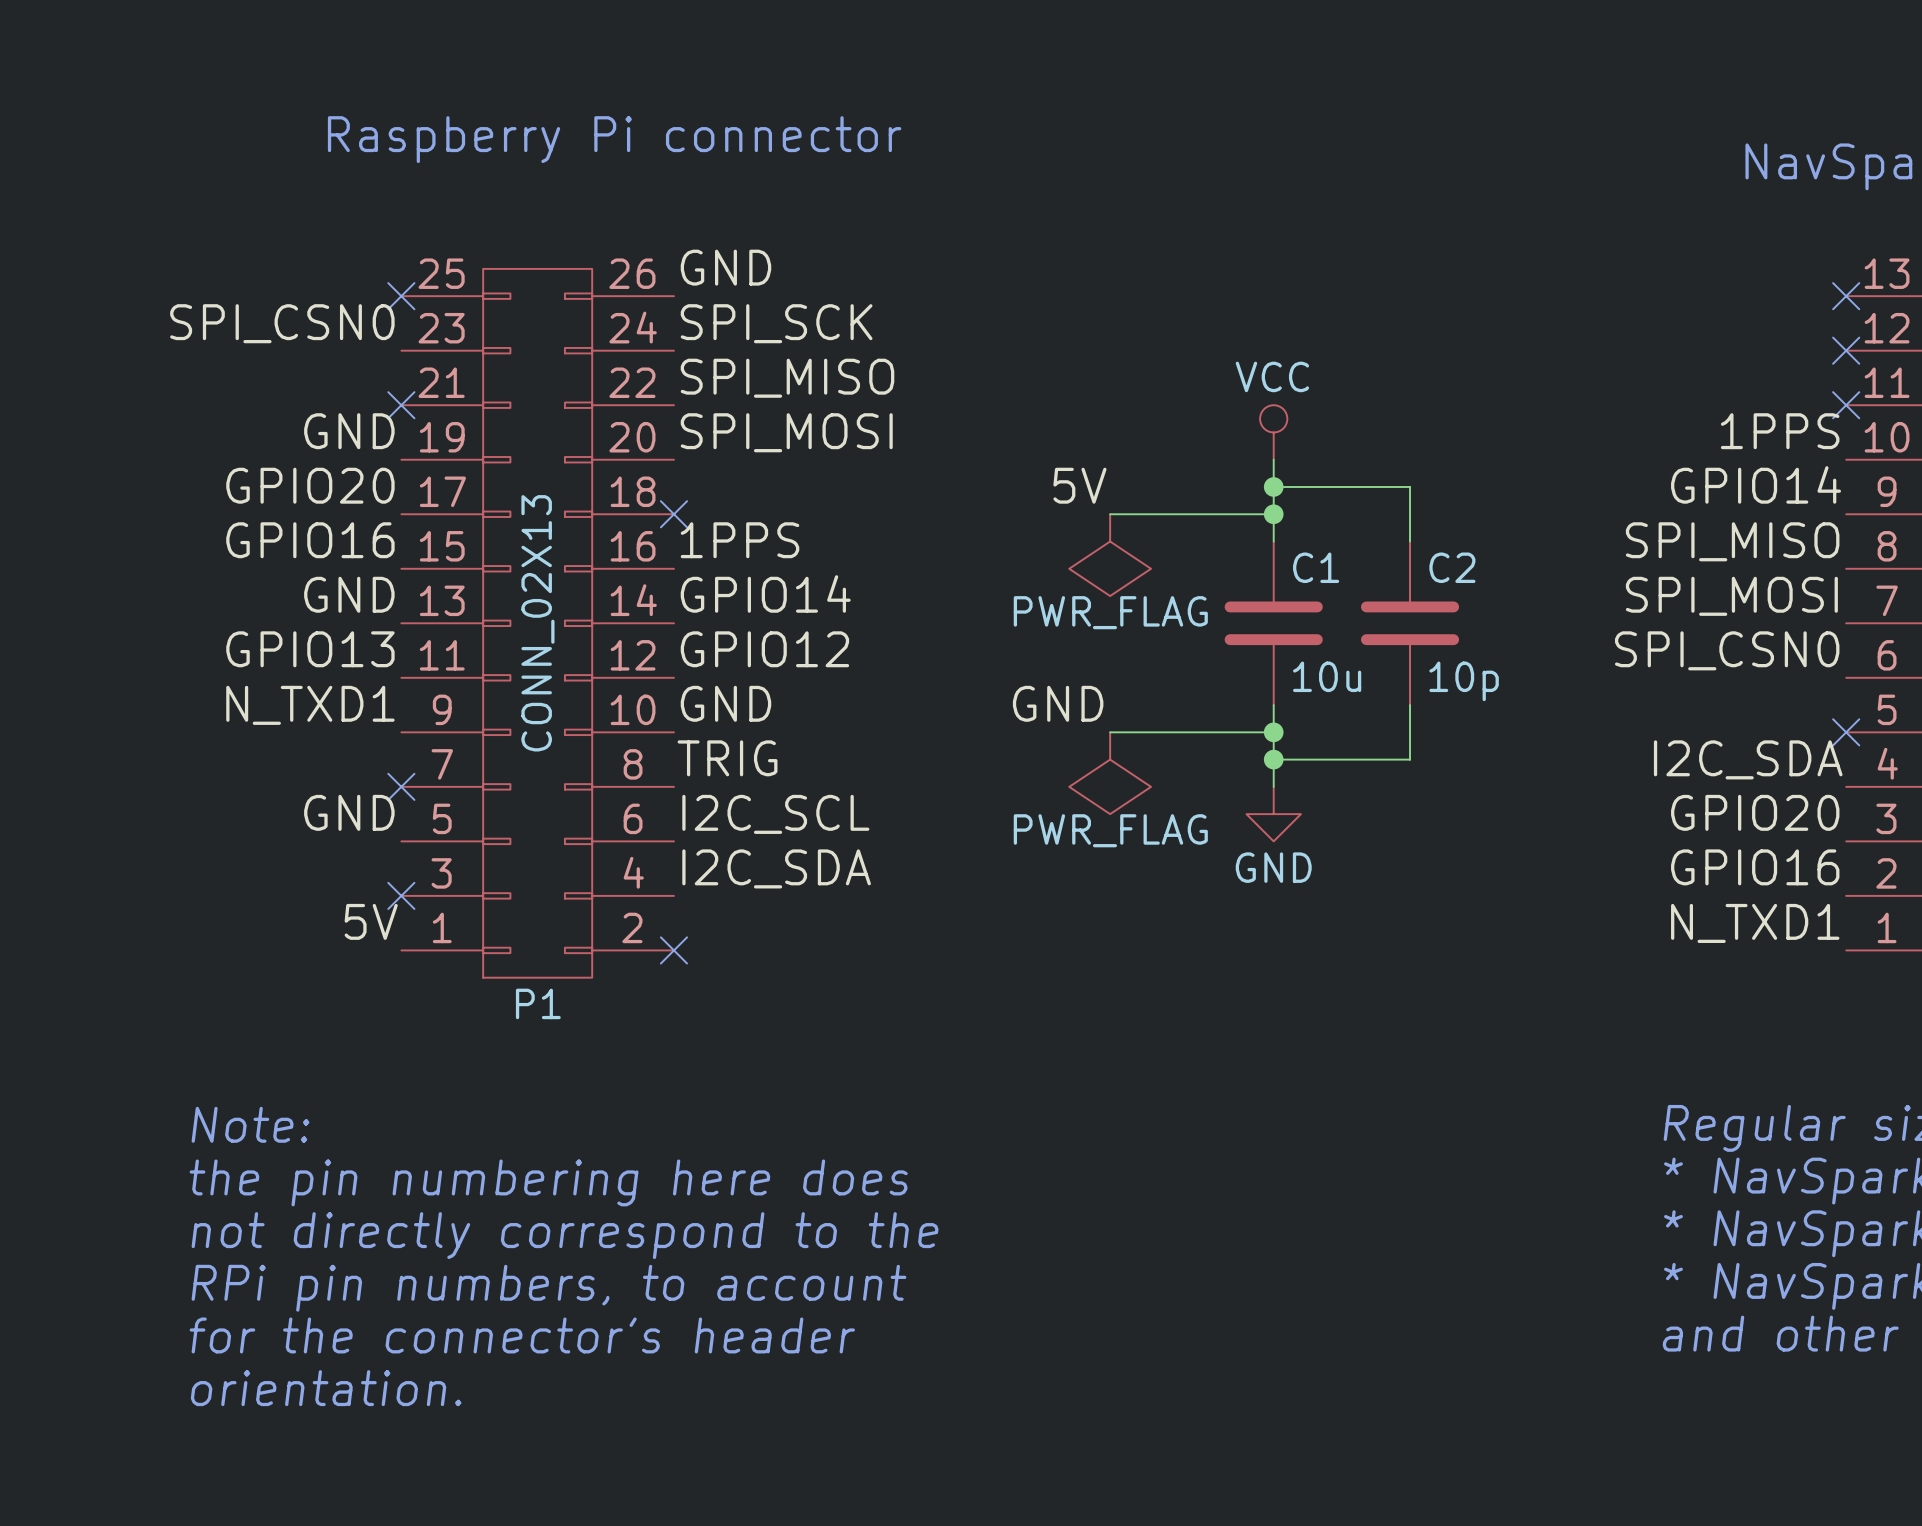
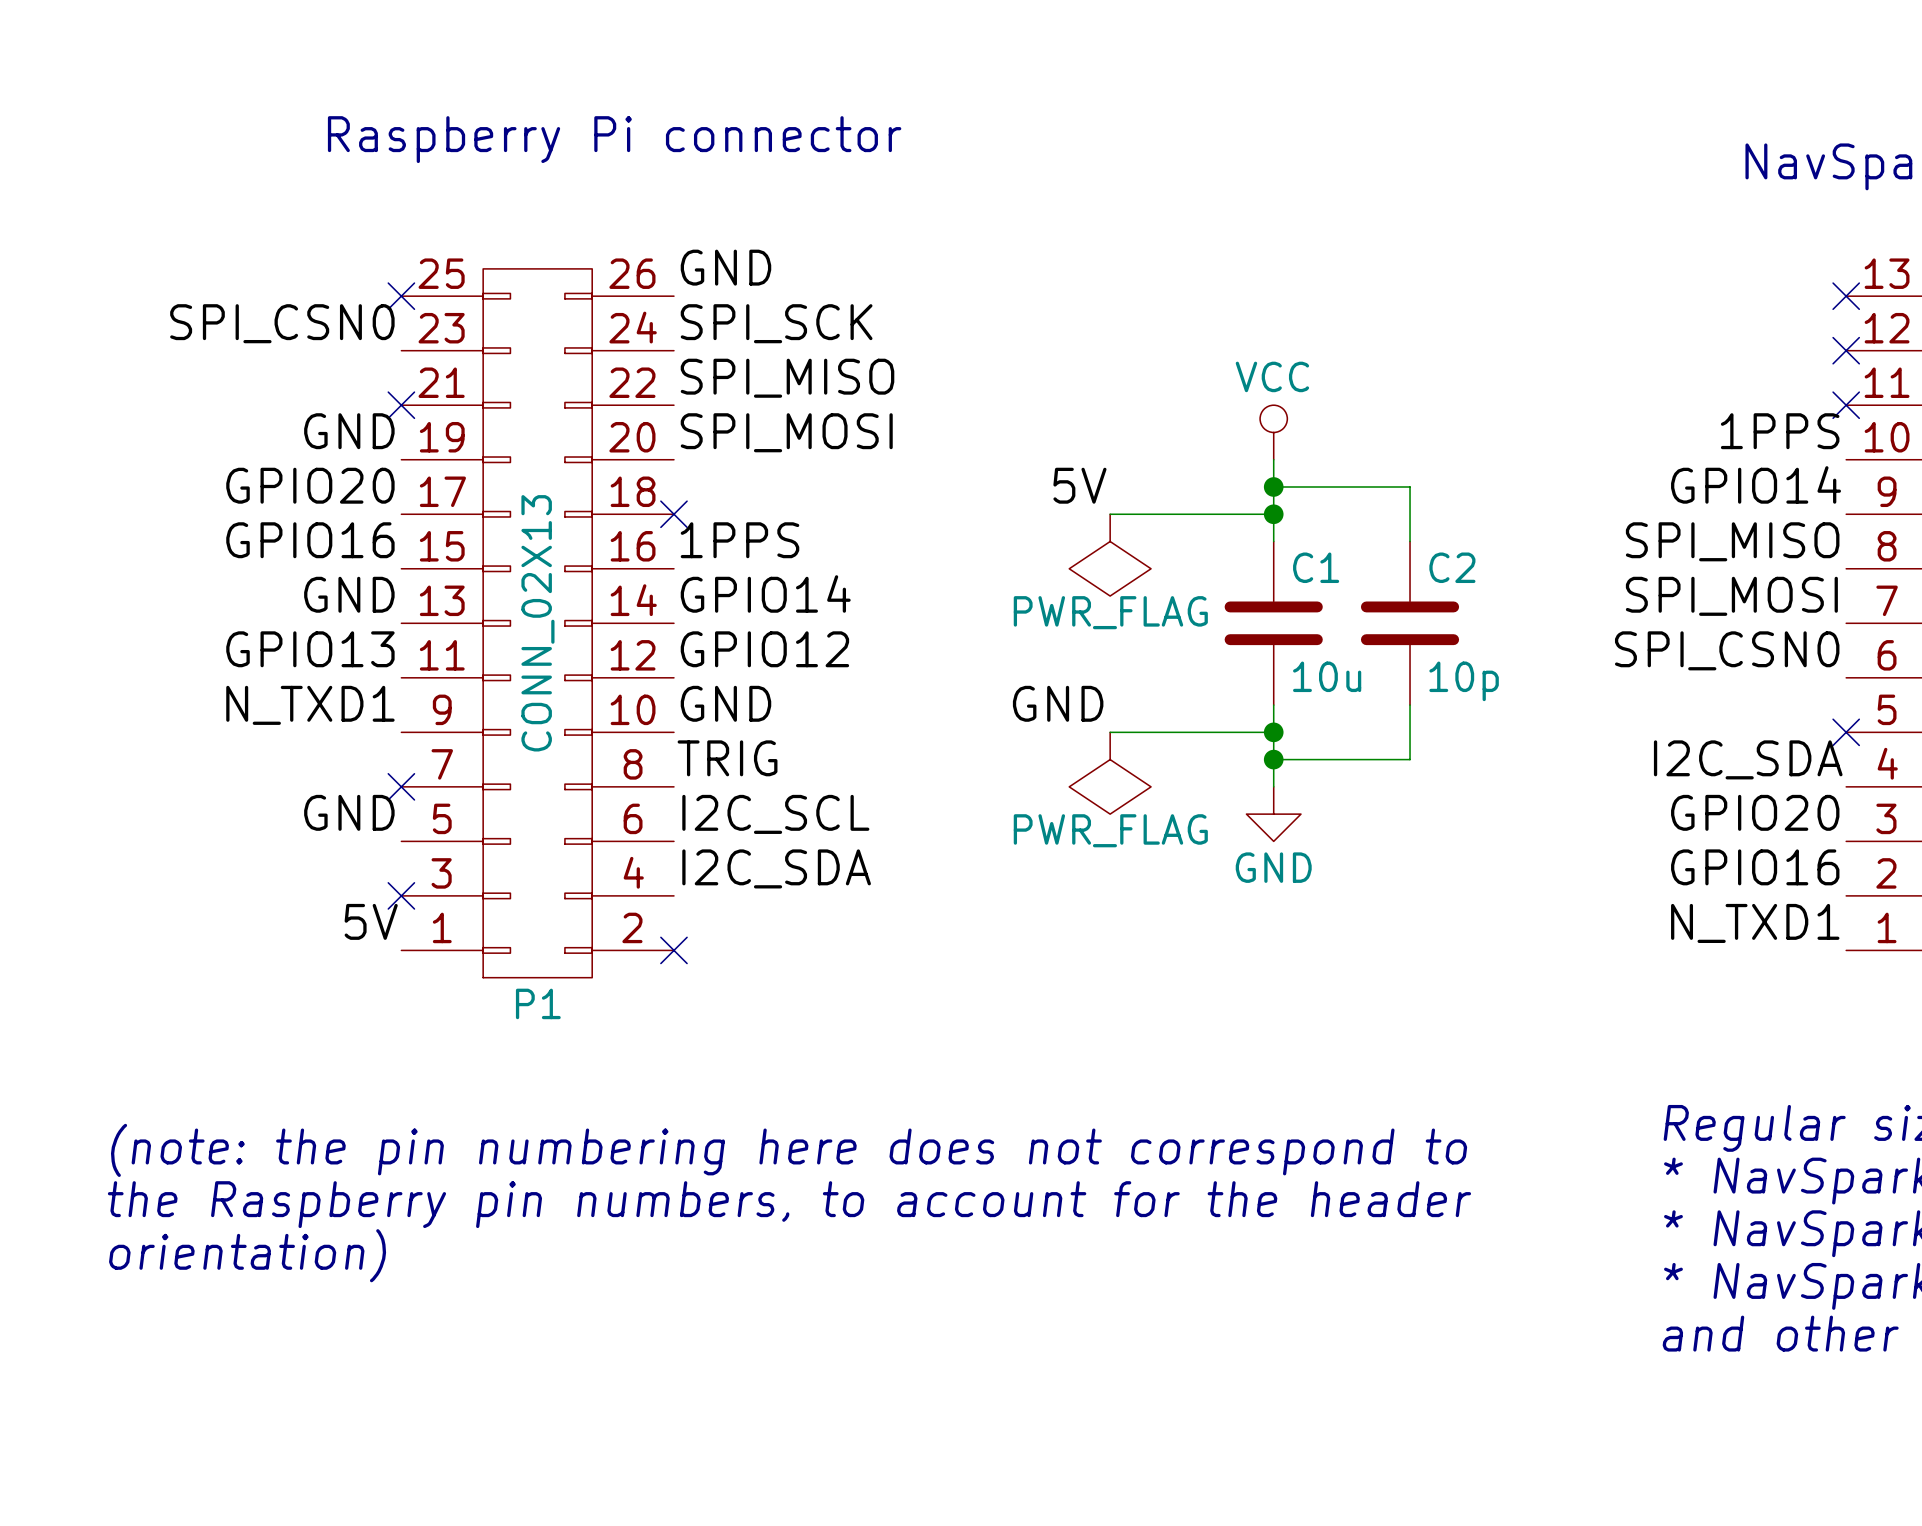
text: Note: (250, 1124) -> none
text: the pin numbering here does (548, 1182) -> (note: the pin numbering here does not correspond to (789, 1150)
text: none -> the Raspberry pin numbers, to account for the header (789, 1204)
text: not directly correspond to the (565, 1235) -> none
text: none -> orientation) (247, 1255)
text: RPi pin numbers, to account (548, 1288) -> none
text: for the connector's header (522, 1335) -> none
text: orientation. (326, 1388) -> none

